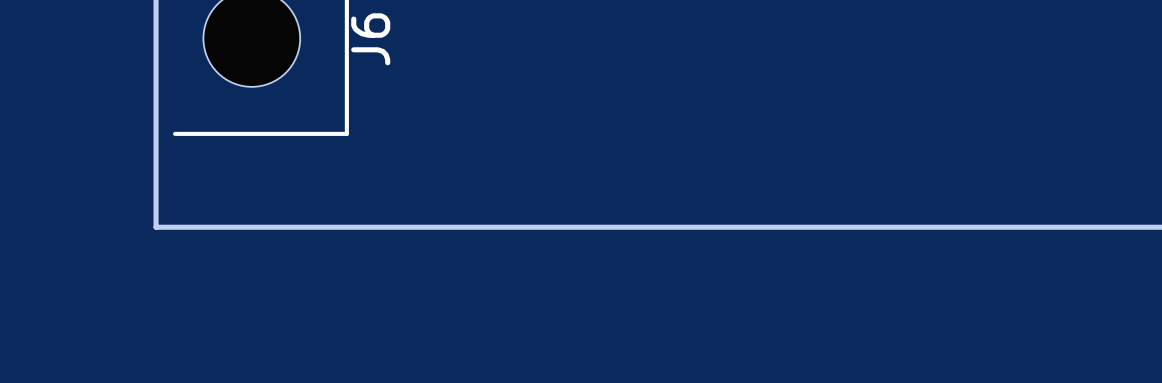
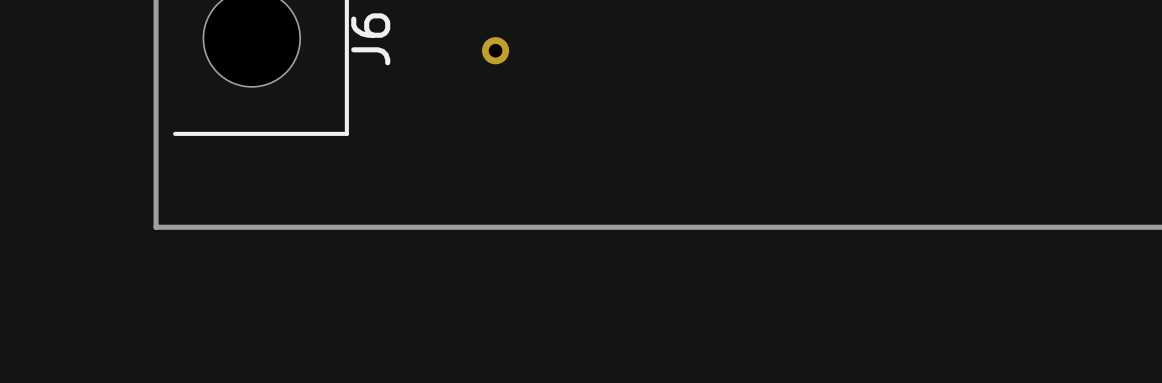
via: none -> (495, 50)

